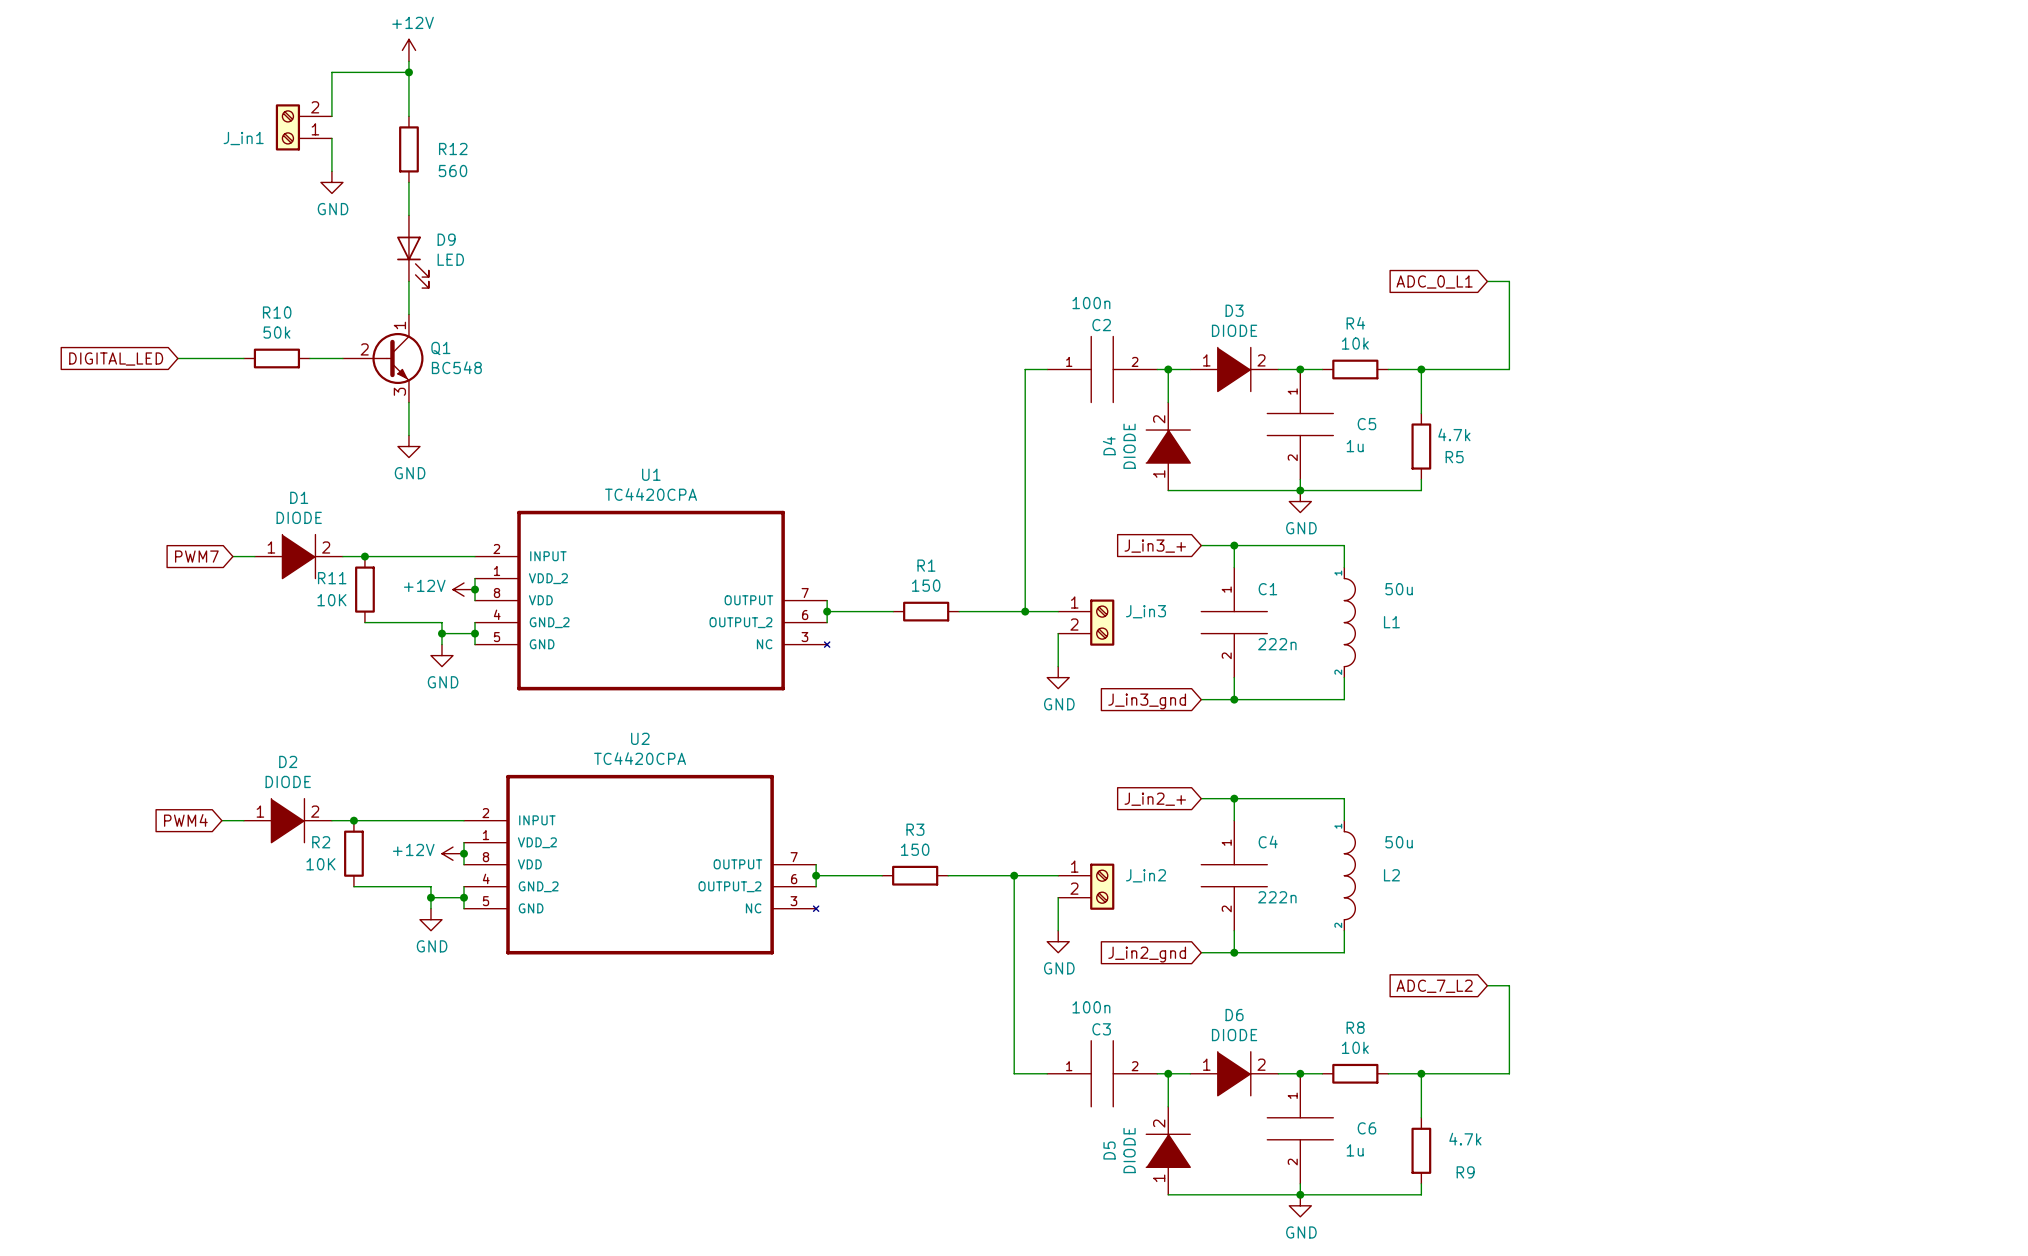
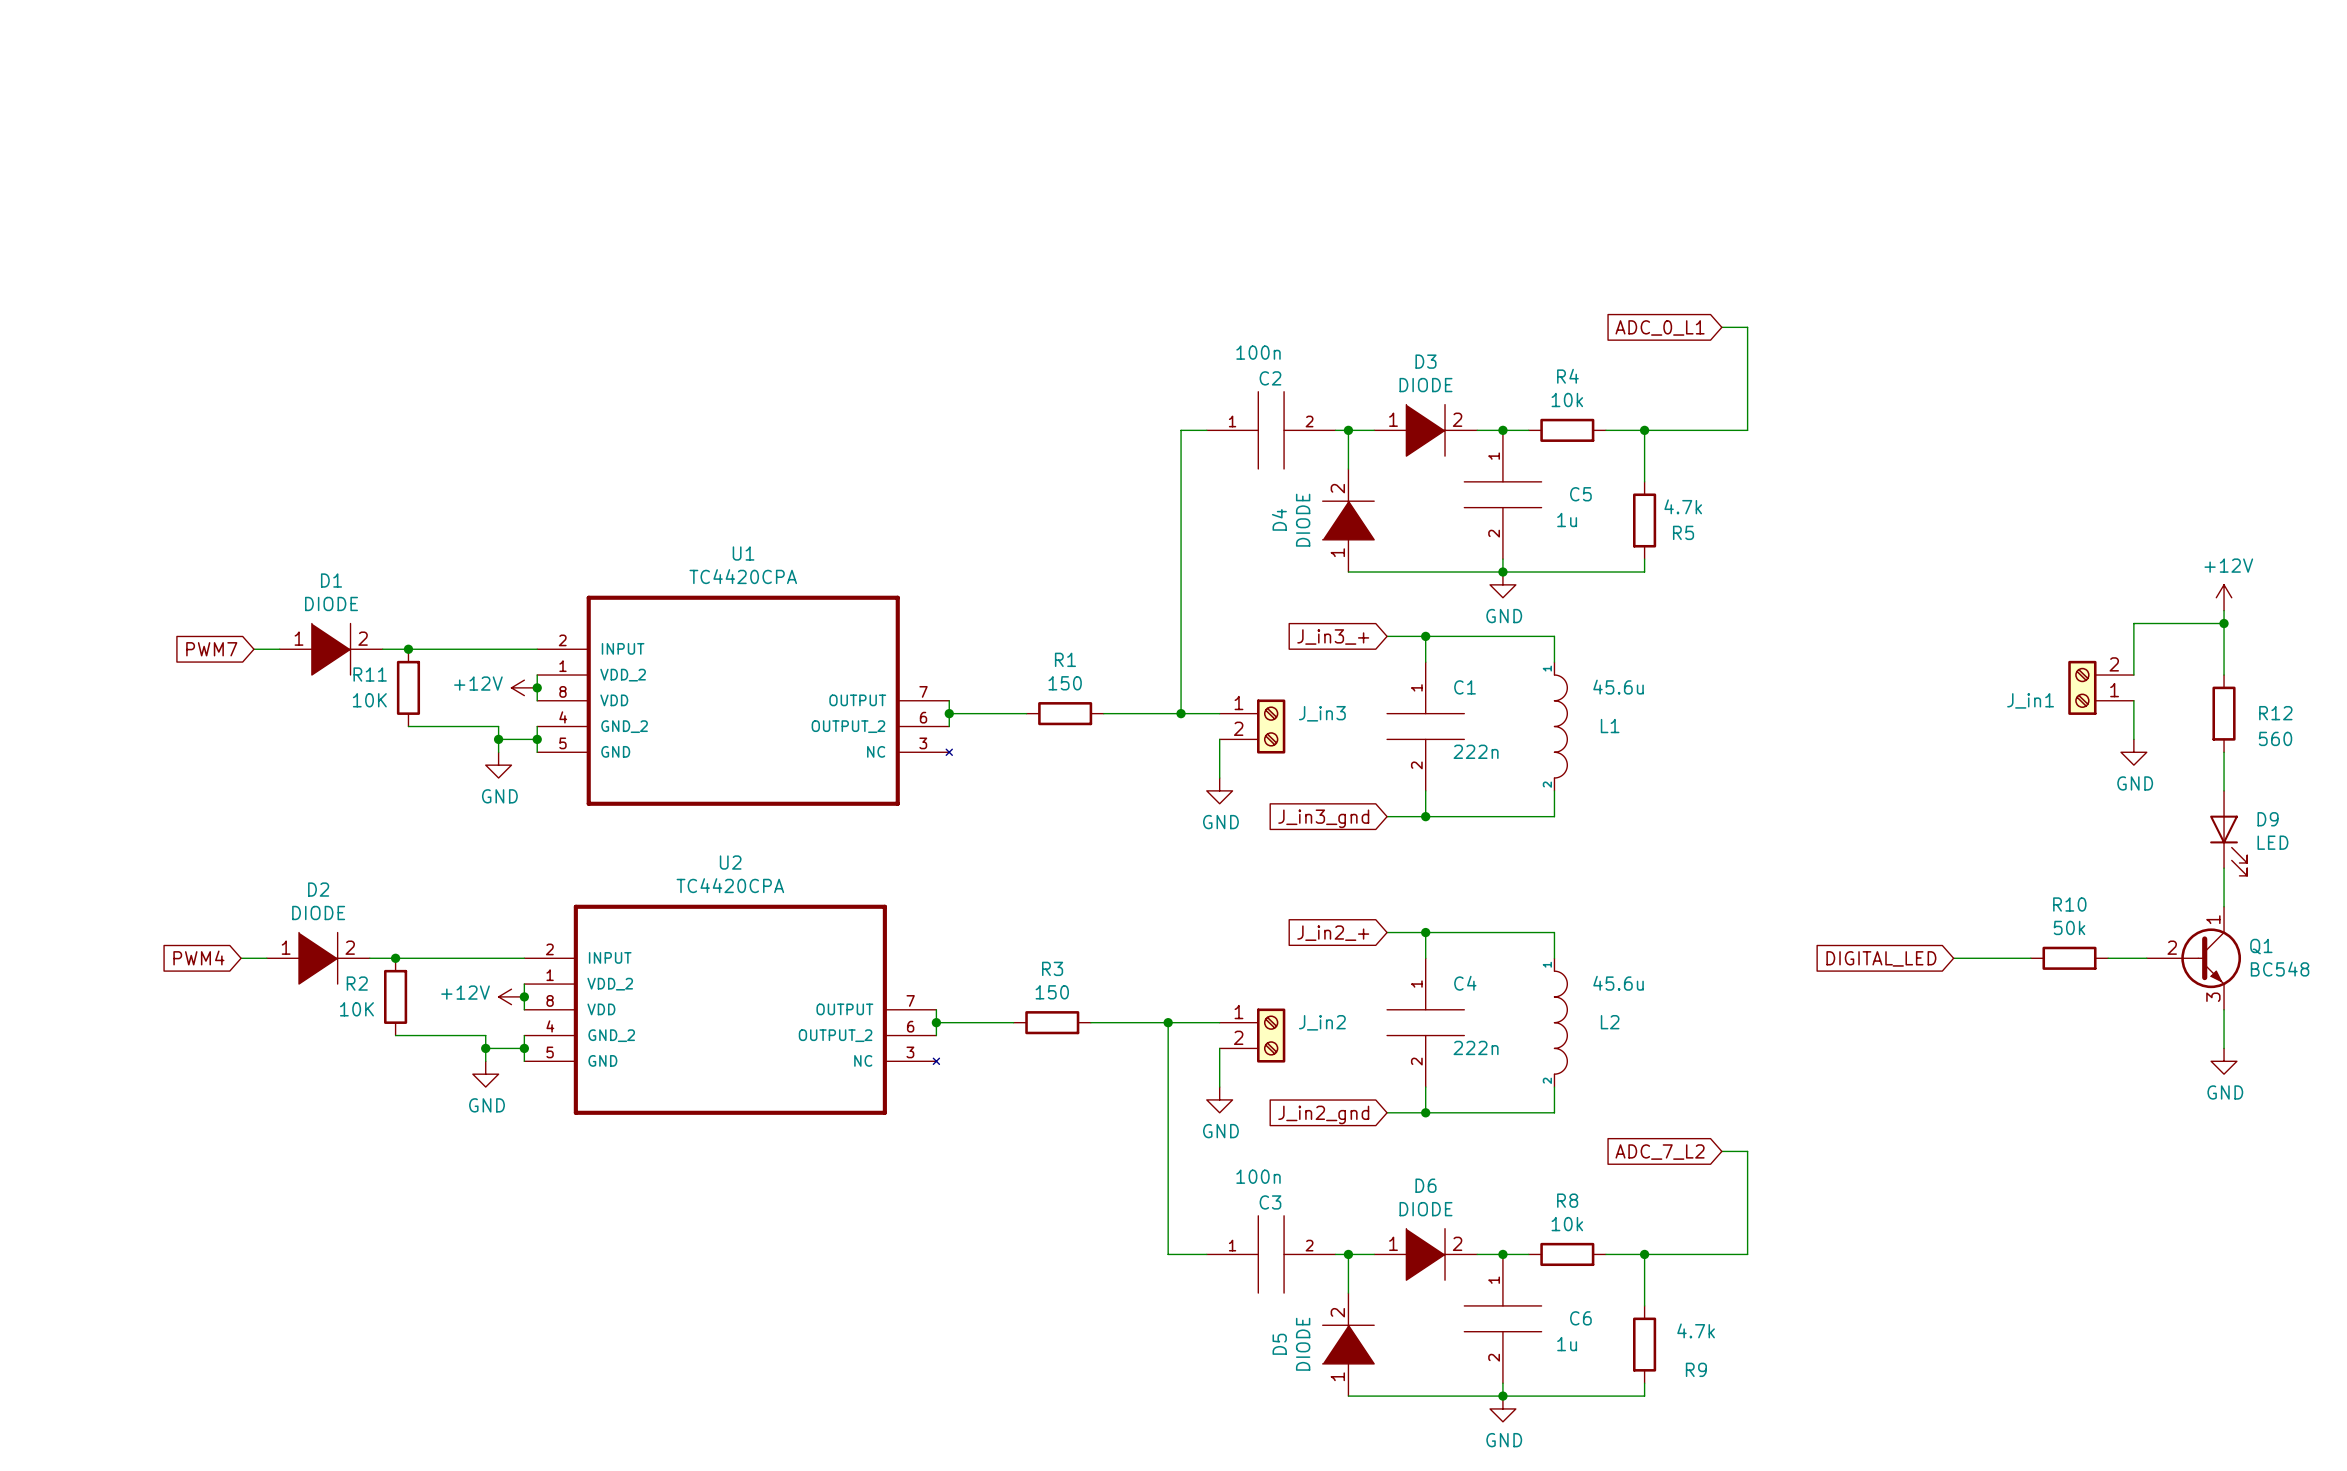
power symbol: +12V (408, 50) -> none
wire: (408, 61) (408, 116) -> none
wire: (408, 72) (331, 72) (331, 116) -> none
junction: (408, 72) -> none
J_in1 position: (303, 127) -> (2101, 687)
wire: (331, 138) (331, 171) -> none
R12 position: (408, 149) -> (2224, 713)
power symbol: GND (331, 182) -> none
wire: (408, 182) (408, 215) -> none
D9 position: (412, 251) -> (2228, 833)
wire: (408, 281) (408, 314) -> none
wire: (177, 358) (243, 358) -> none
R10 position: (276, 358) -> (2069, 958)
wire: (309, 358) (342, 358) -> none
Q1 position: (383, 358) -> (2193, 958)
global label: DIGITAL_LED (116, 359) -> none
wire: (408, 402) (408, 435) -> none
power symbol: GND (408, 446) -> none
power symbol: none -> +12V (2224, 597)
wire: none -> (2224, 610) (2224, 675)
wire: none -> (2224, 623) (2133, 623) (2133, 675)
junction: none -> (2224, 623)
L1 value: 50u (1399, 589) -> 45.6u (1618, 687)
wire: none -> (2133, 700) (2133, 739)
power symbol: none -> GND (2133, 752)
wire: none -> (2224, 752) (2224, 790)
wire: none -> (2224, 868) (2224, 906)
wire: none -> (1953, 958) (2030, 958)
wire: none -> (2108, 958) (2146, 958)
global label: none -> DIGITAL_LED (1881, 958)
L2 value: 50u (1399, 842) -> 45.6u (1618, 983)
wire: none -> (2224, 1009) (2224, 1048)
power symbol: none -> GND (2224, 1061)

